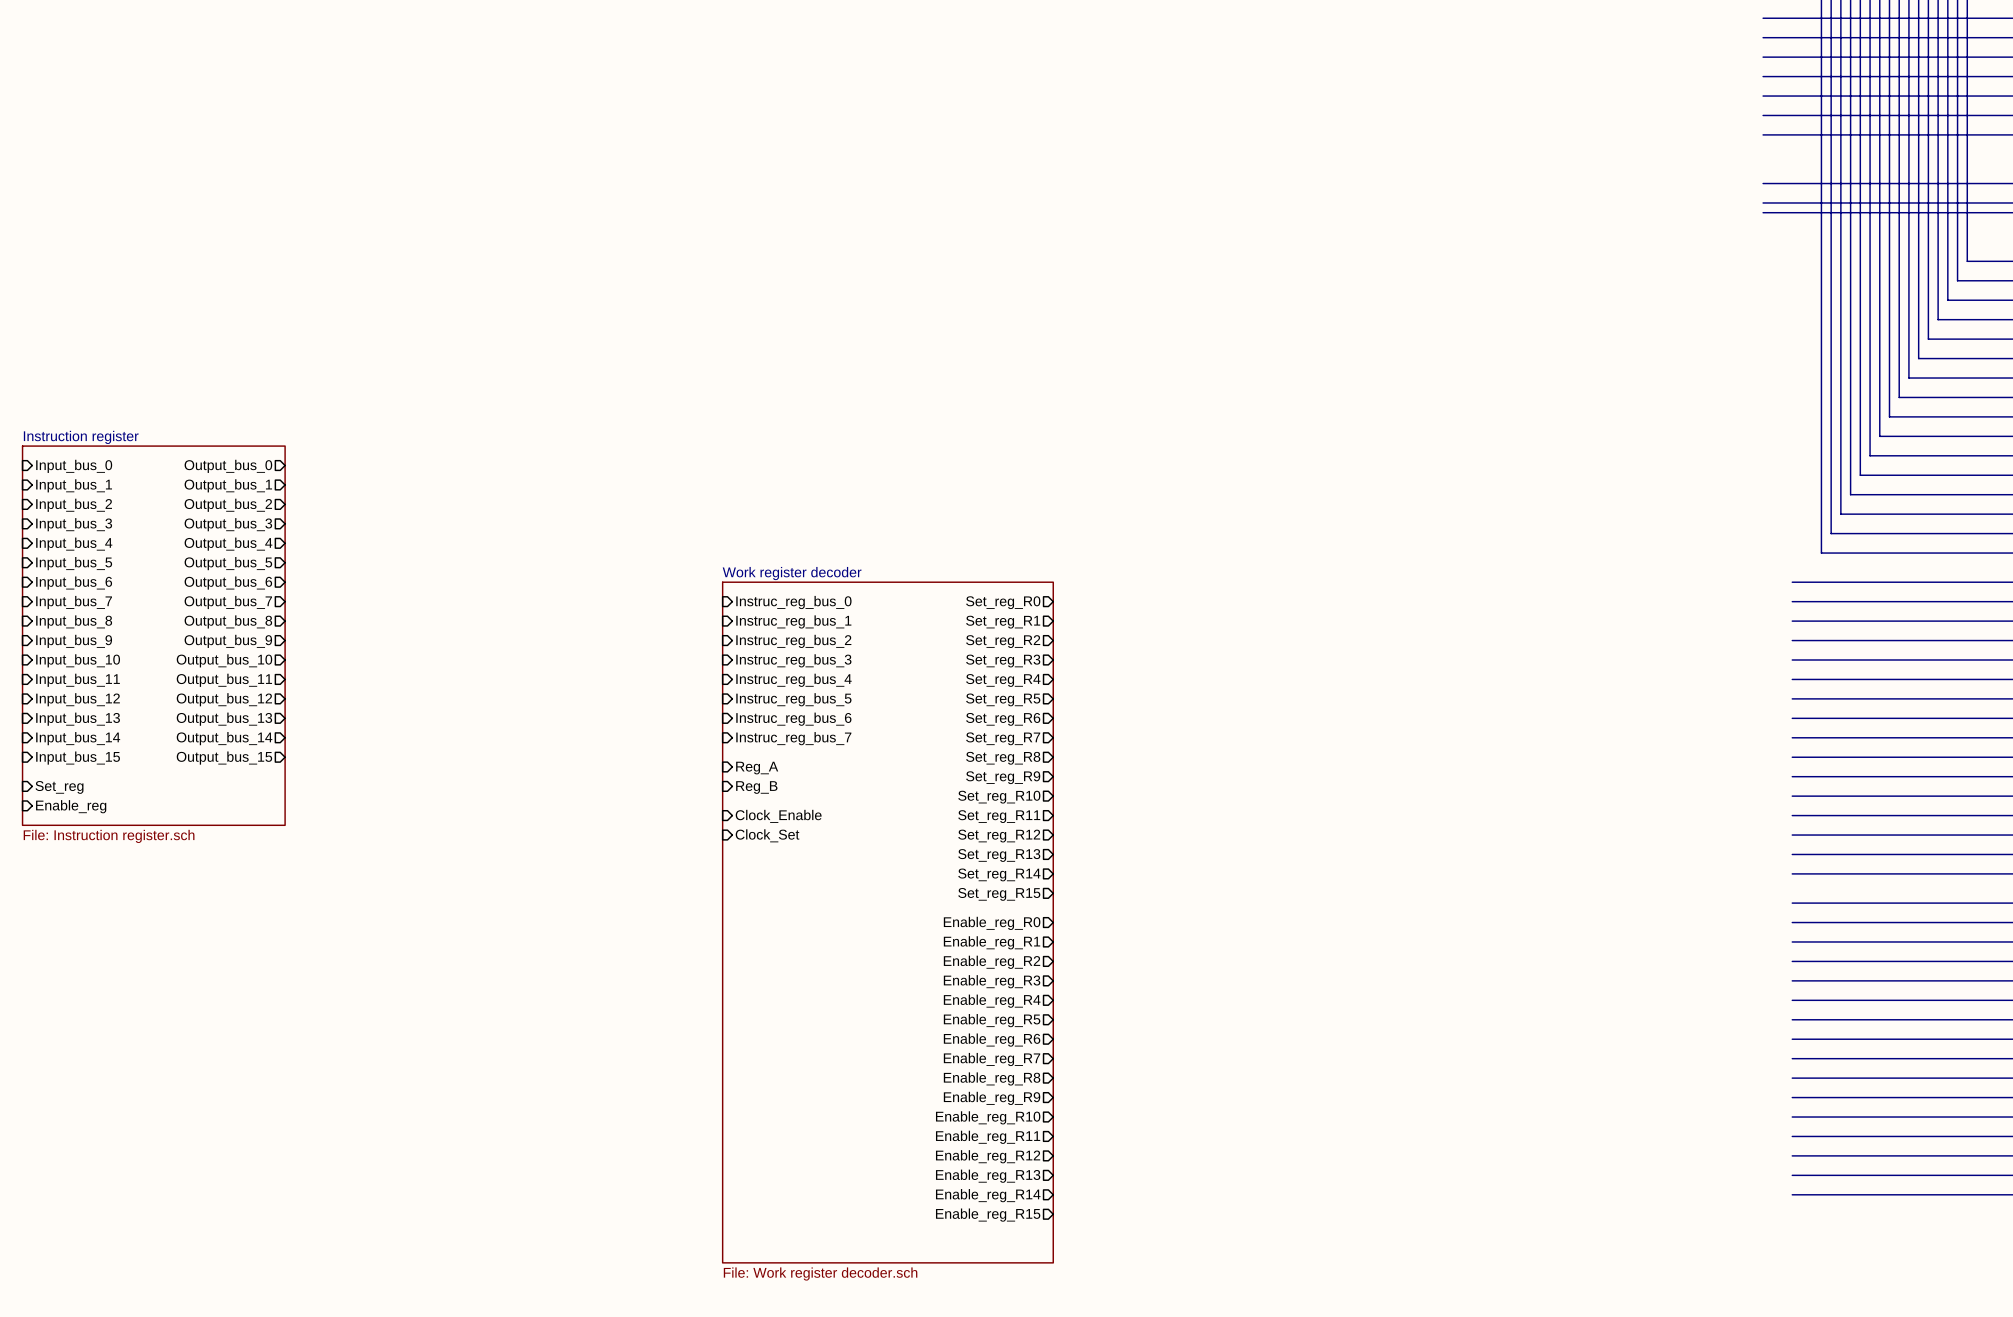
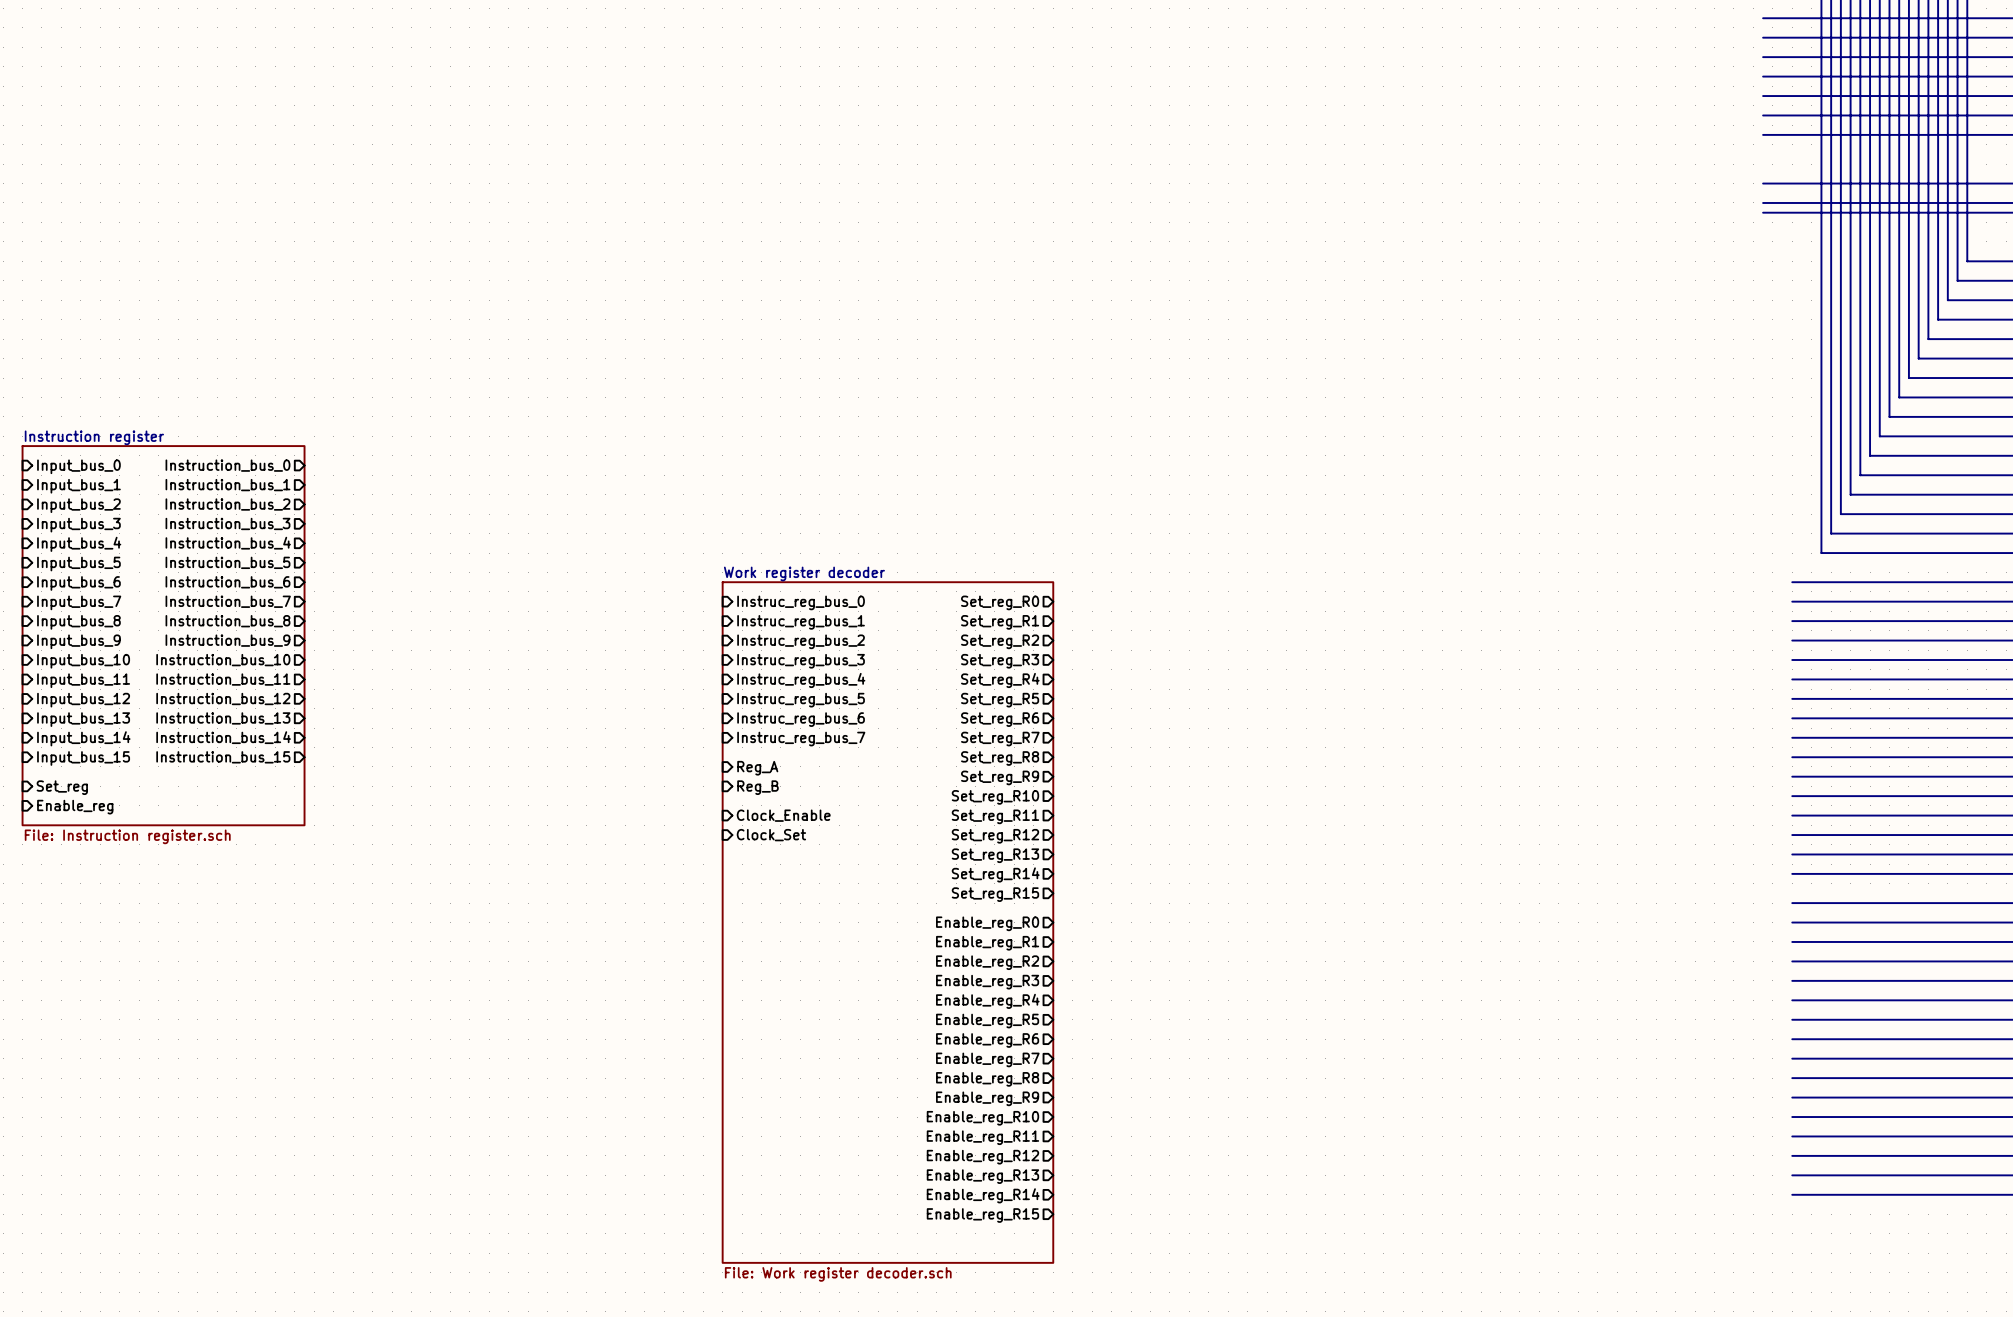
sheet pin: Output_bus_0 (228, 466) -> none
sheet pin: none -> Instruction_bus_0 (227, 465)
sheet pin: Output_bus_1 (228, 485) -> none
sheet pin: none -> Instruction_bus_1 (227, 485)
sheet pin: Output_bus_2 (228, 505) -> none
sheet pin: none -> Instruction_bus_2 (227, 504)
sheet pin: Output_bus_3 (228, 524) -> none
sheet pin: none -> Instruction_bus_3 (227, 523)
sheet pin: Output_bus_4 (228, 544) -> none
sheet pin: none -> Instruction_bus_4 (228, 543)
sheet pin: Output_bus_5 (228, 563) -> none
sheet pin: none -> Instruction_bus_5 (227, 562)
sheet pin: none -> Instruction_bus_6 (227, 582)
sheet pin: Output_bus_6 (228, 583) -> none
sheet pin: Output_bus_7 (228, 602) -> none
sheet pin: none -> Instruction_bus_7 (228, 601)
sheet pin: Output_bus_8 (228, 621) -> none
sheet pin: none -> Instruction_bus_8 (227, 621)
sheet Instruction register: File: Instruction register.sch (153, 635) -> none
sheet Instruction register: none -> File: Instruction register.sch (163, 635)
sheet pin: Output_bus_9 (228, 641) -> none
sheet pin: none -> Instruction_bus_9 (227, 640)
sheet pin: Output_bus_10 (224, 660) -> none
sheet pin: none -> Instruction_bus_10 (223, 660)
sheet pin: Output_bus_11 (224, 680) -> none
sheet pin: none -> Instruction_bus_11 (223, 679)
sheet pin: Output_bus_12 (224, 699) -> none
sheet pin: none -> Instruction_bus_12 (223, 698)
sheet pin: Output_bus_13 (224, 719) -> none
sheet pin: none -> Instruction_bus_13 (223, 718)
sheet pin: Output_bus_14 (224, 738) -> none
sheet pin: none -> Instruction_bus_14 (223, 737)
sheet pin: Output_bus_15 (224, 758) -> none
sheet pin: none -> Instruction_bus_15 (223, 757)

